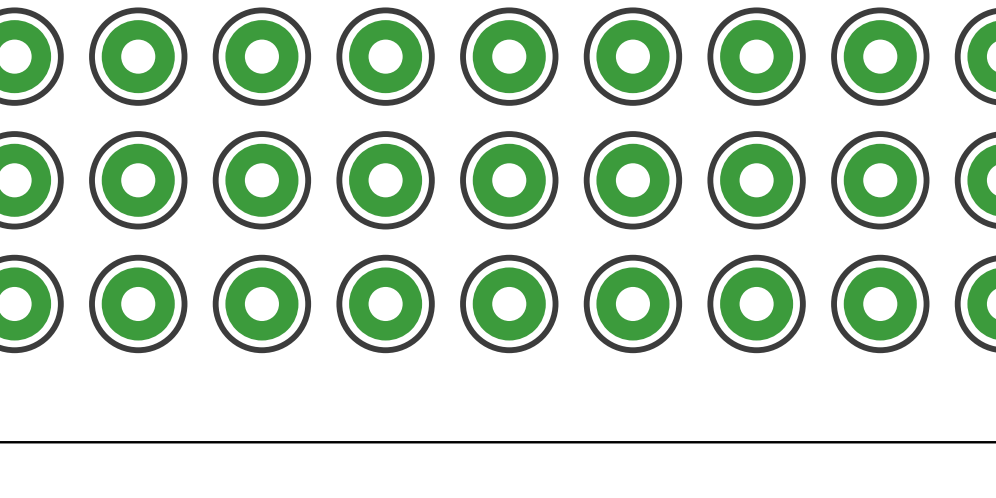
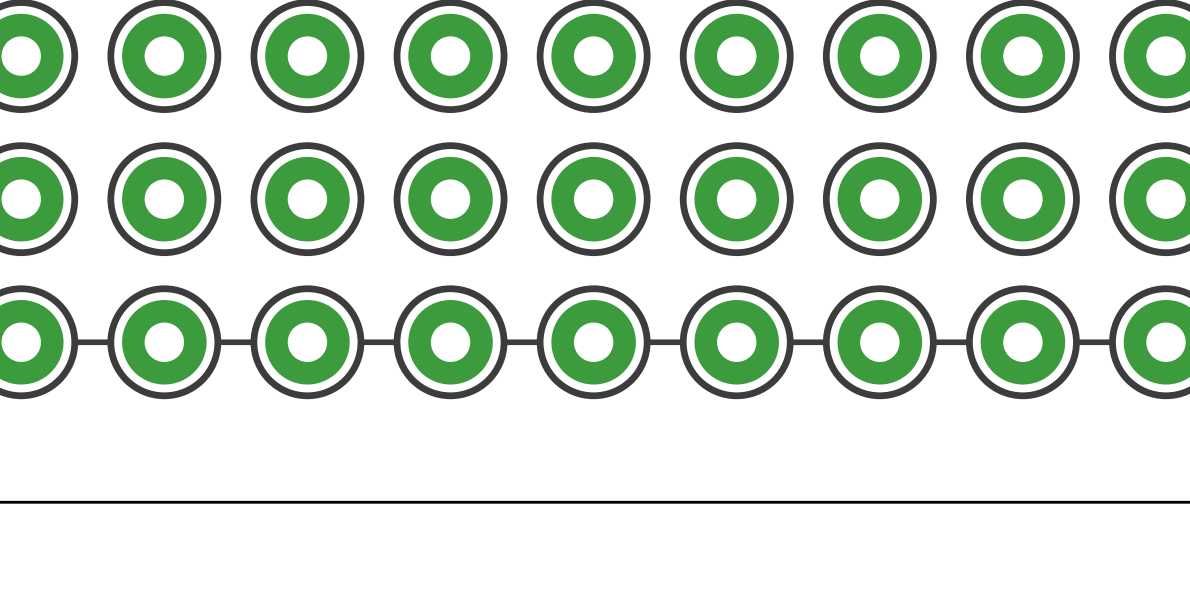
line: none -> (74, 342) (110, 342)
line: none -> (217, 342) (253, 342)
line: none -> (360, 342) (397, 342)
line: none -> (504, 342) (540, 342)
line: none -> (647, 342) (683, 342)
line: none -> (790, 342) (826, 342)
line: none -> (933, 342) (969, 342)
line: none -> (1076, 342) (1112, 342)

